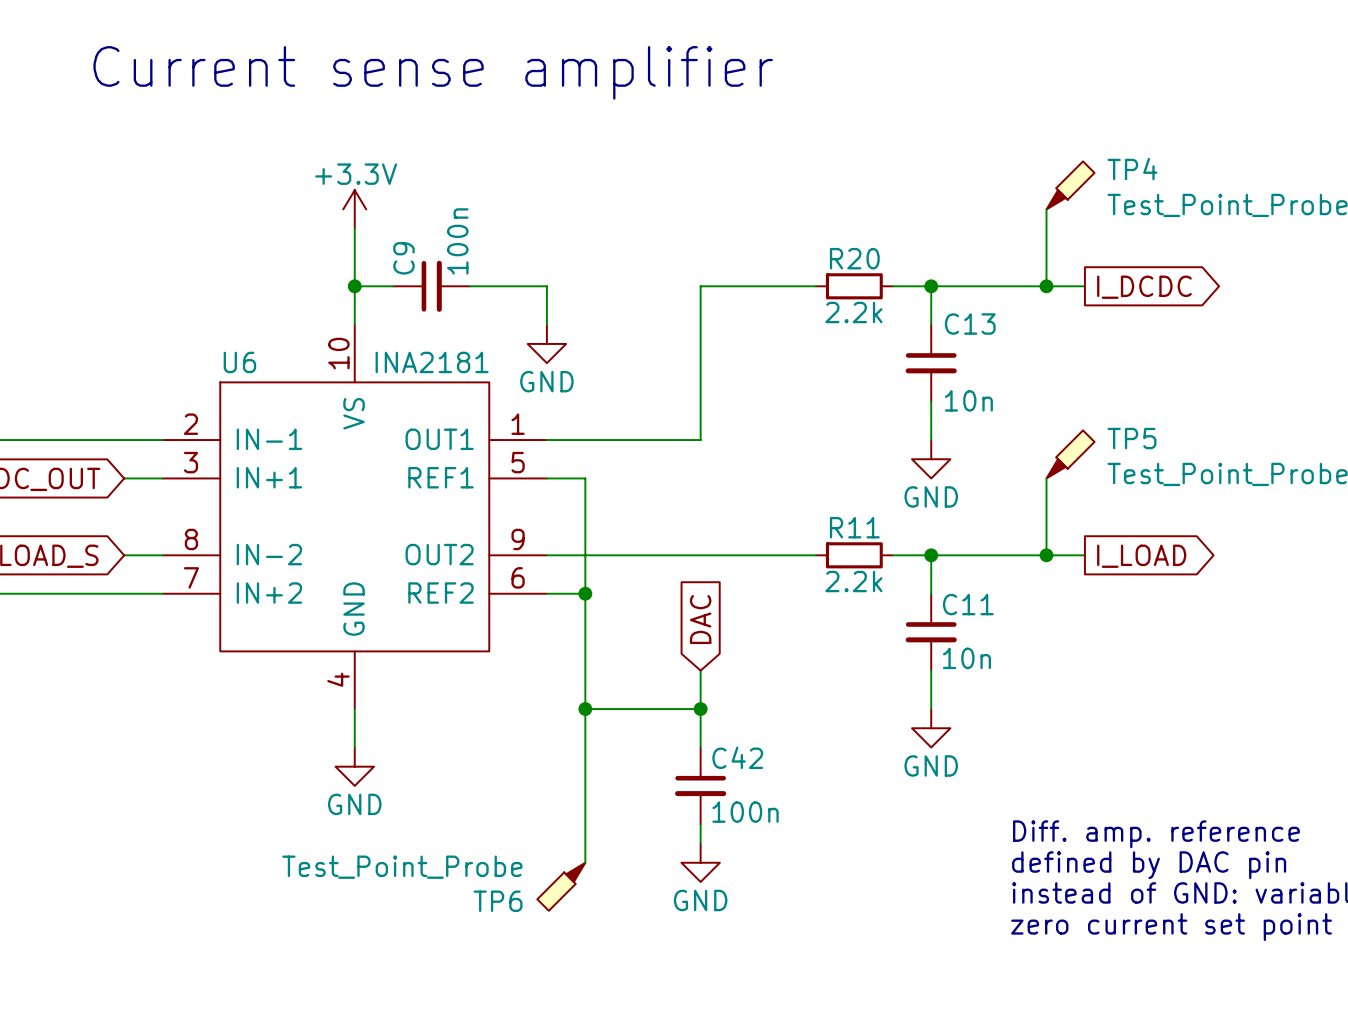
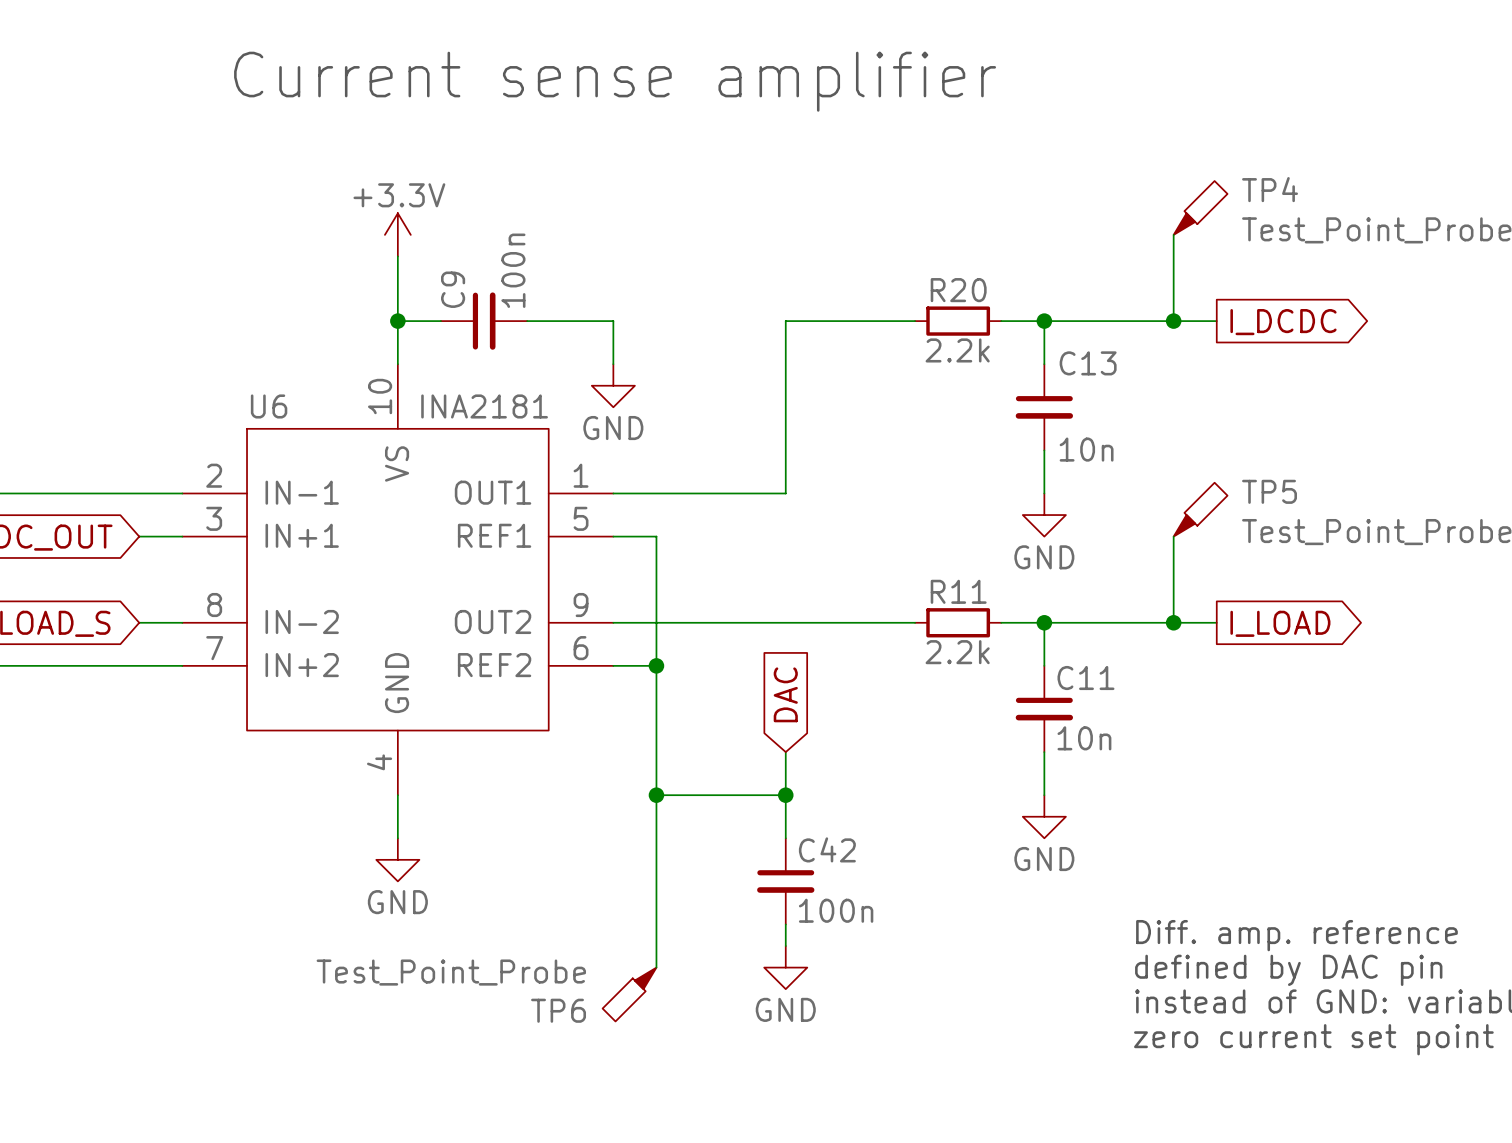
text position: Current sense amplifier (433, 72) -> Current sense amplifier (615, 81)

